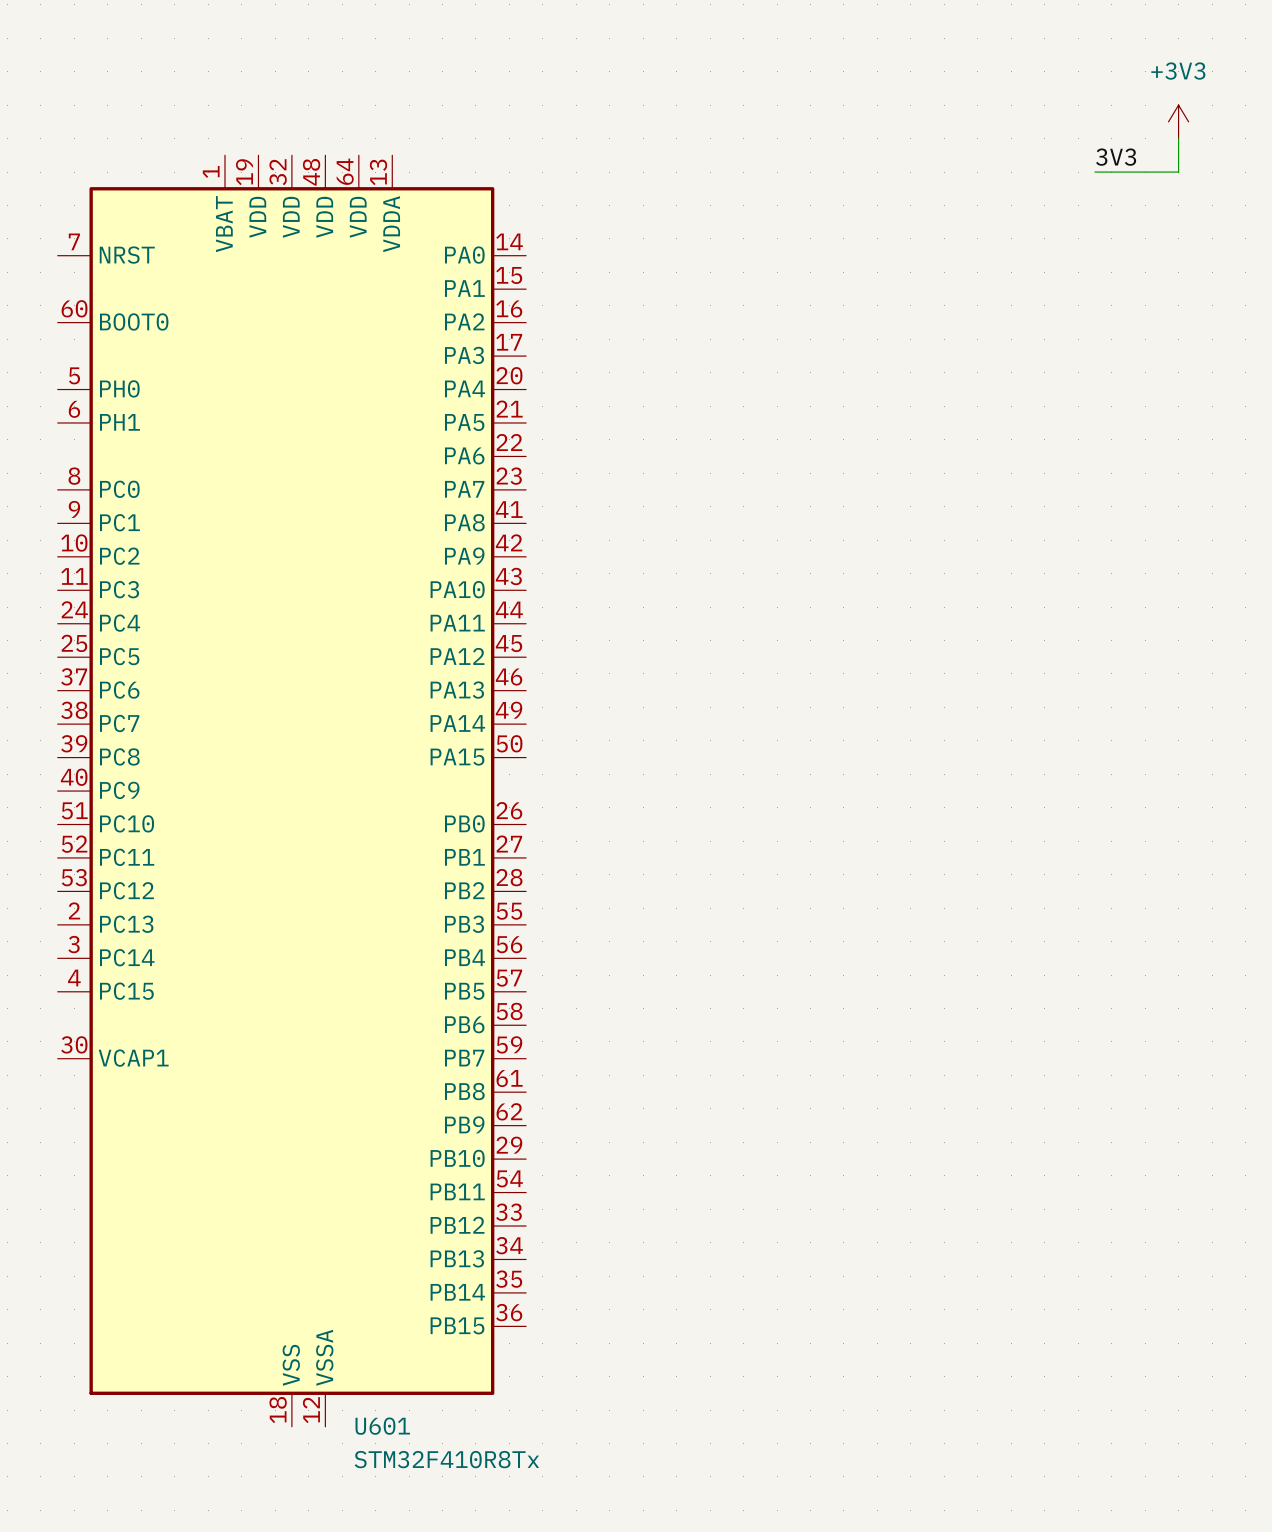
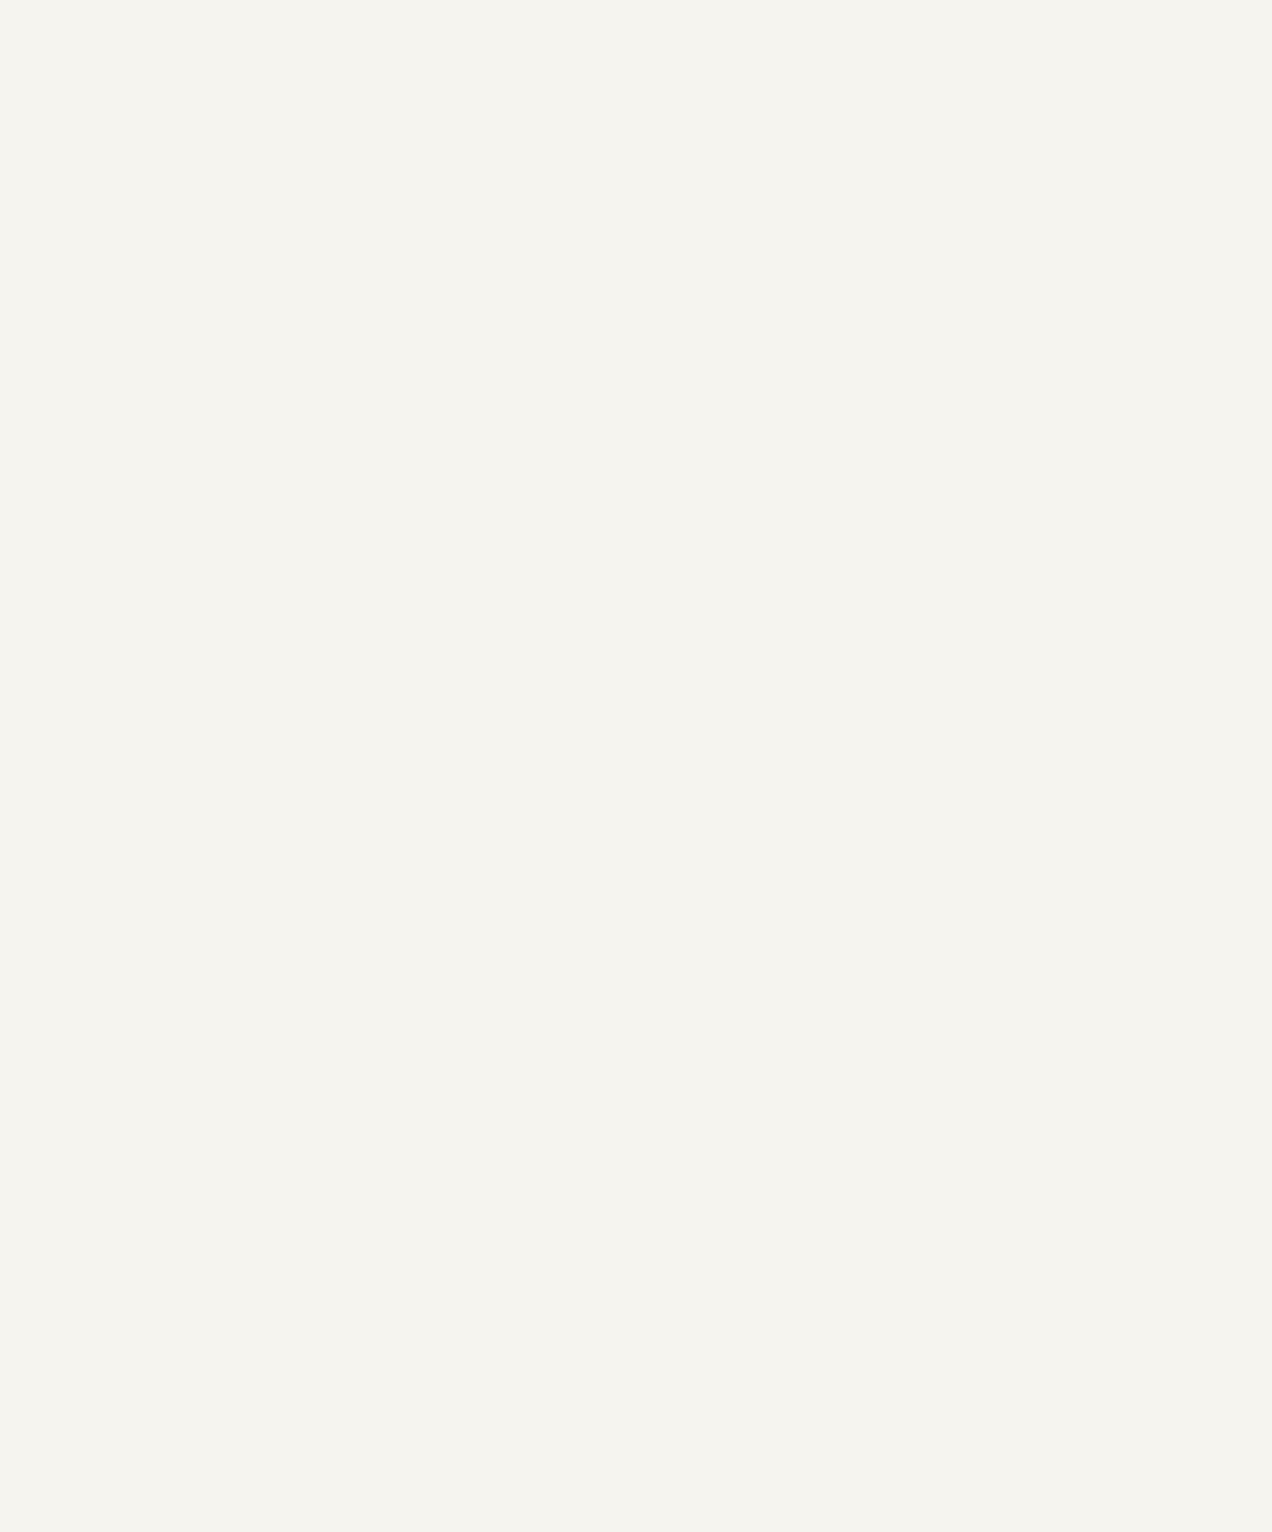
power symbol: +3V3 (1178, 121) -> none
wire: (1178, 138) (1178, 172) (1094, 172) -> none
label: 3V3 (1116, 157) -> none
U601: STM32F410R8Tx (291, 791) -> none

